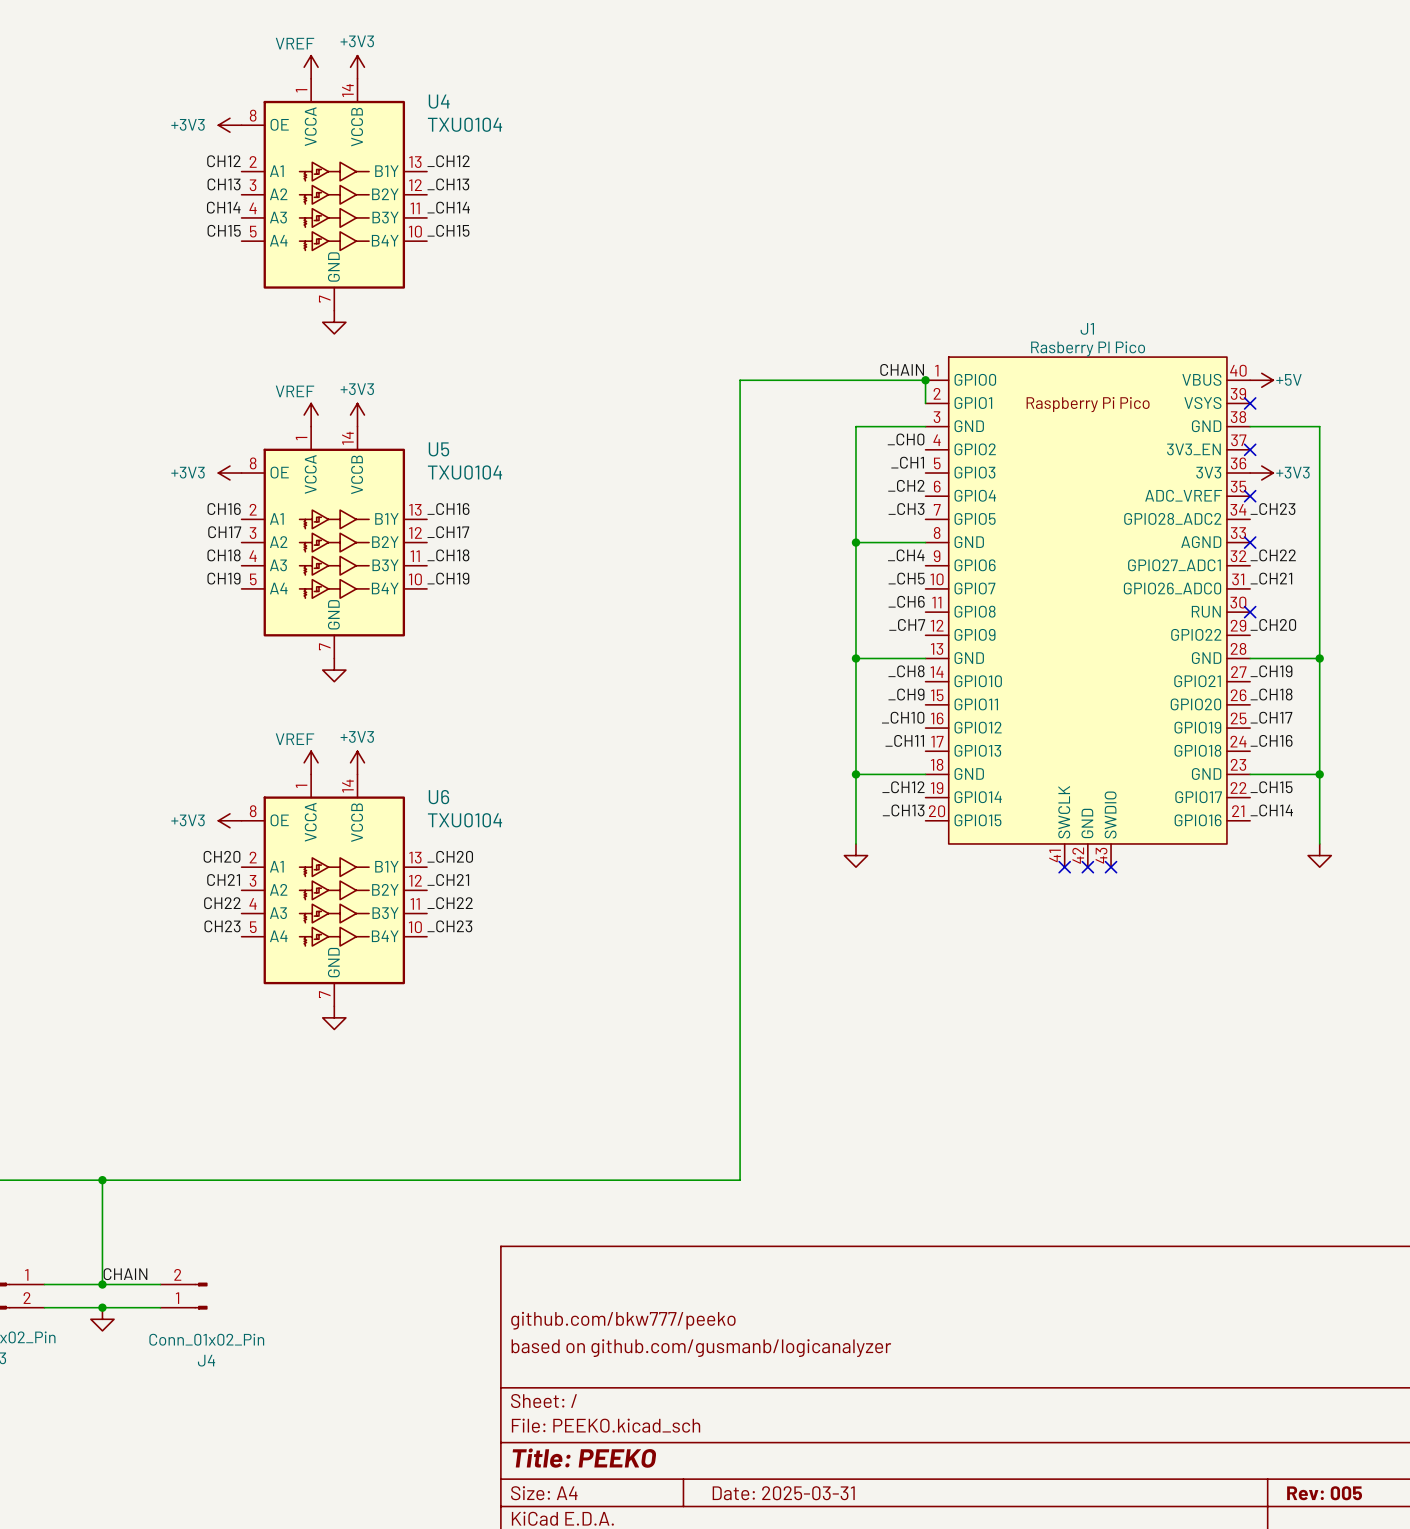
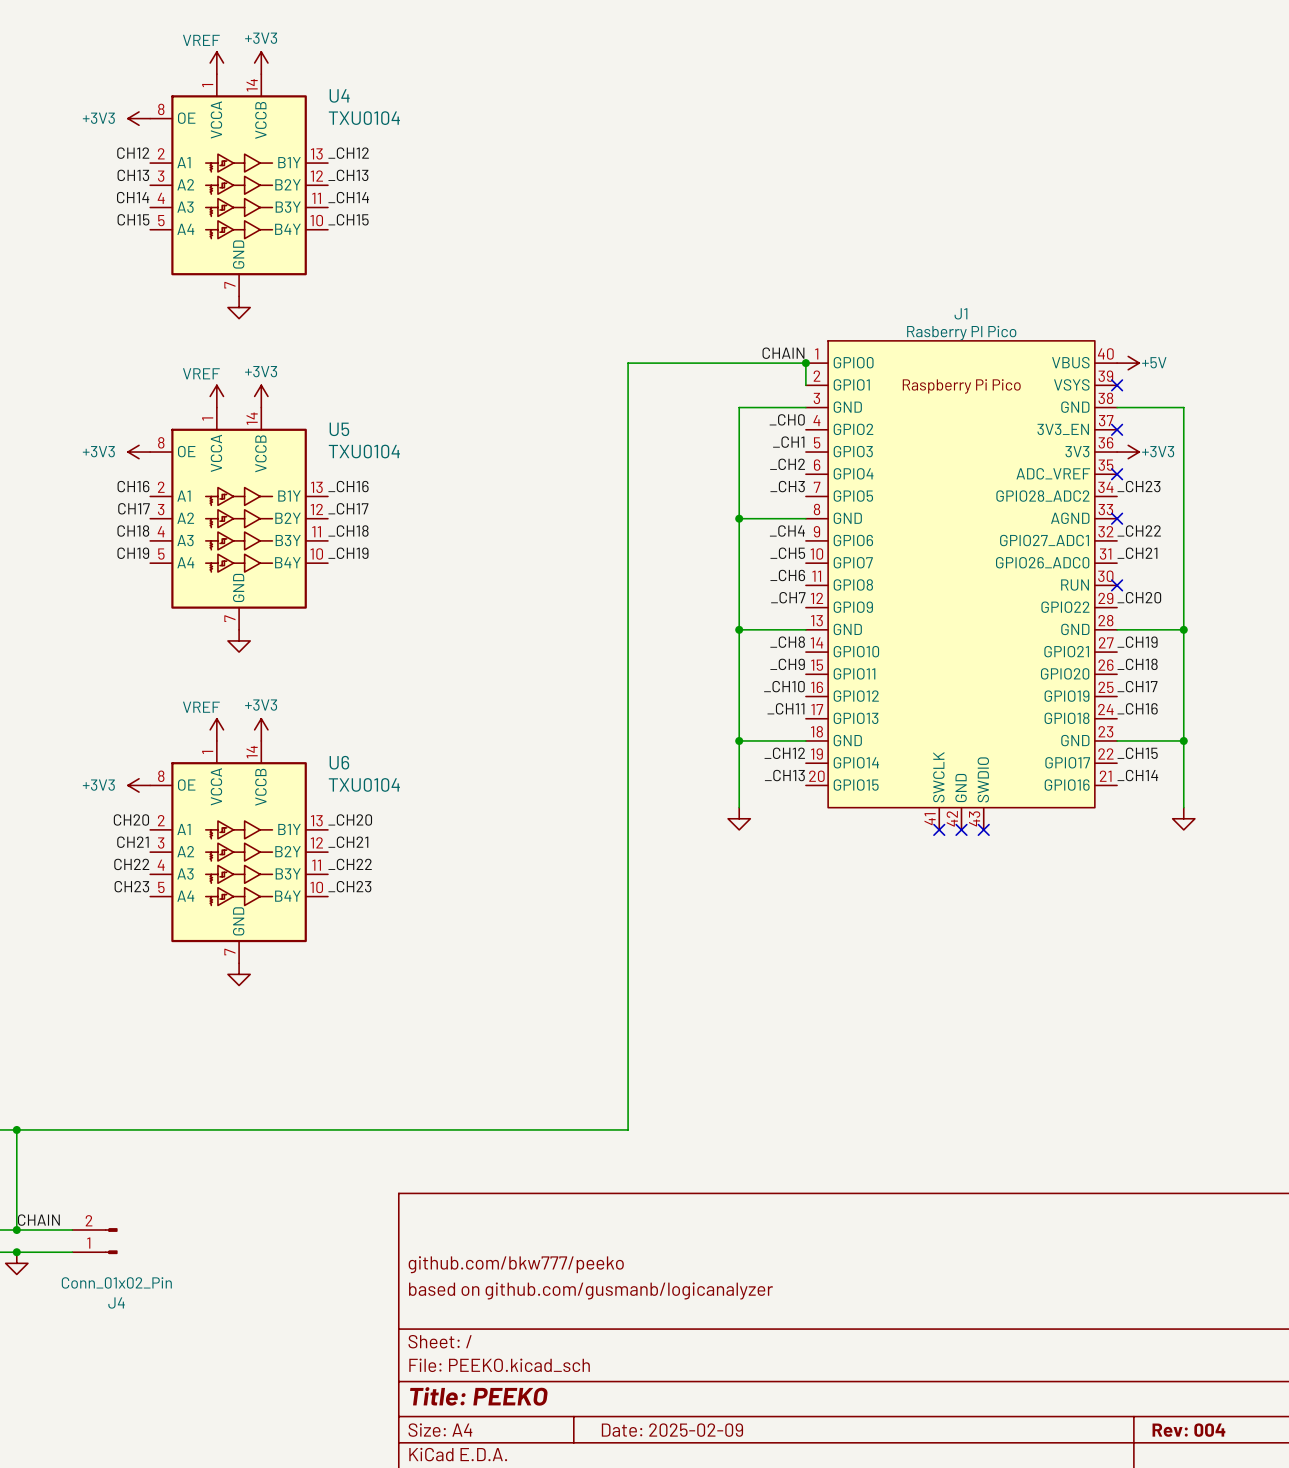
title block: Date: 2025-03-31 (783, 1493) -> Date: 2025-02-09 (672, 1430)
title block: Rev: 005 (1324, 1493) -> Rev: 004 (1188, 1430)

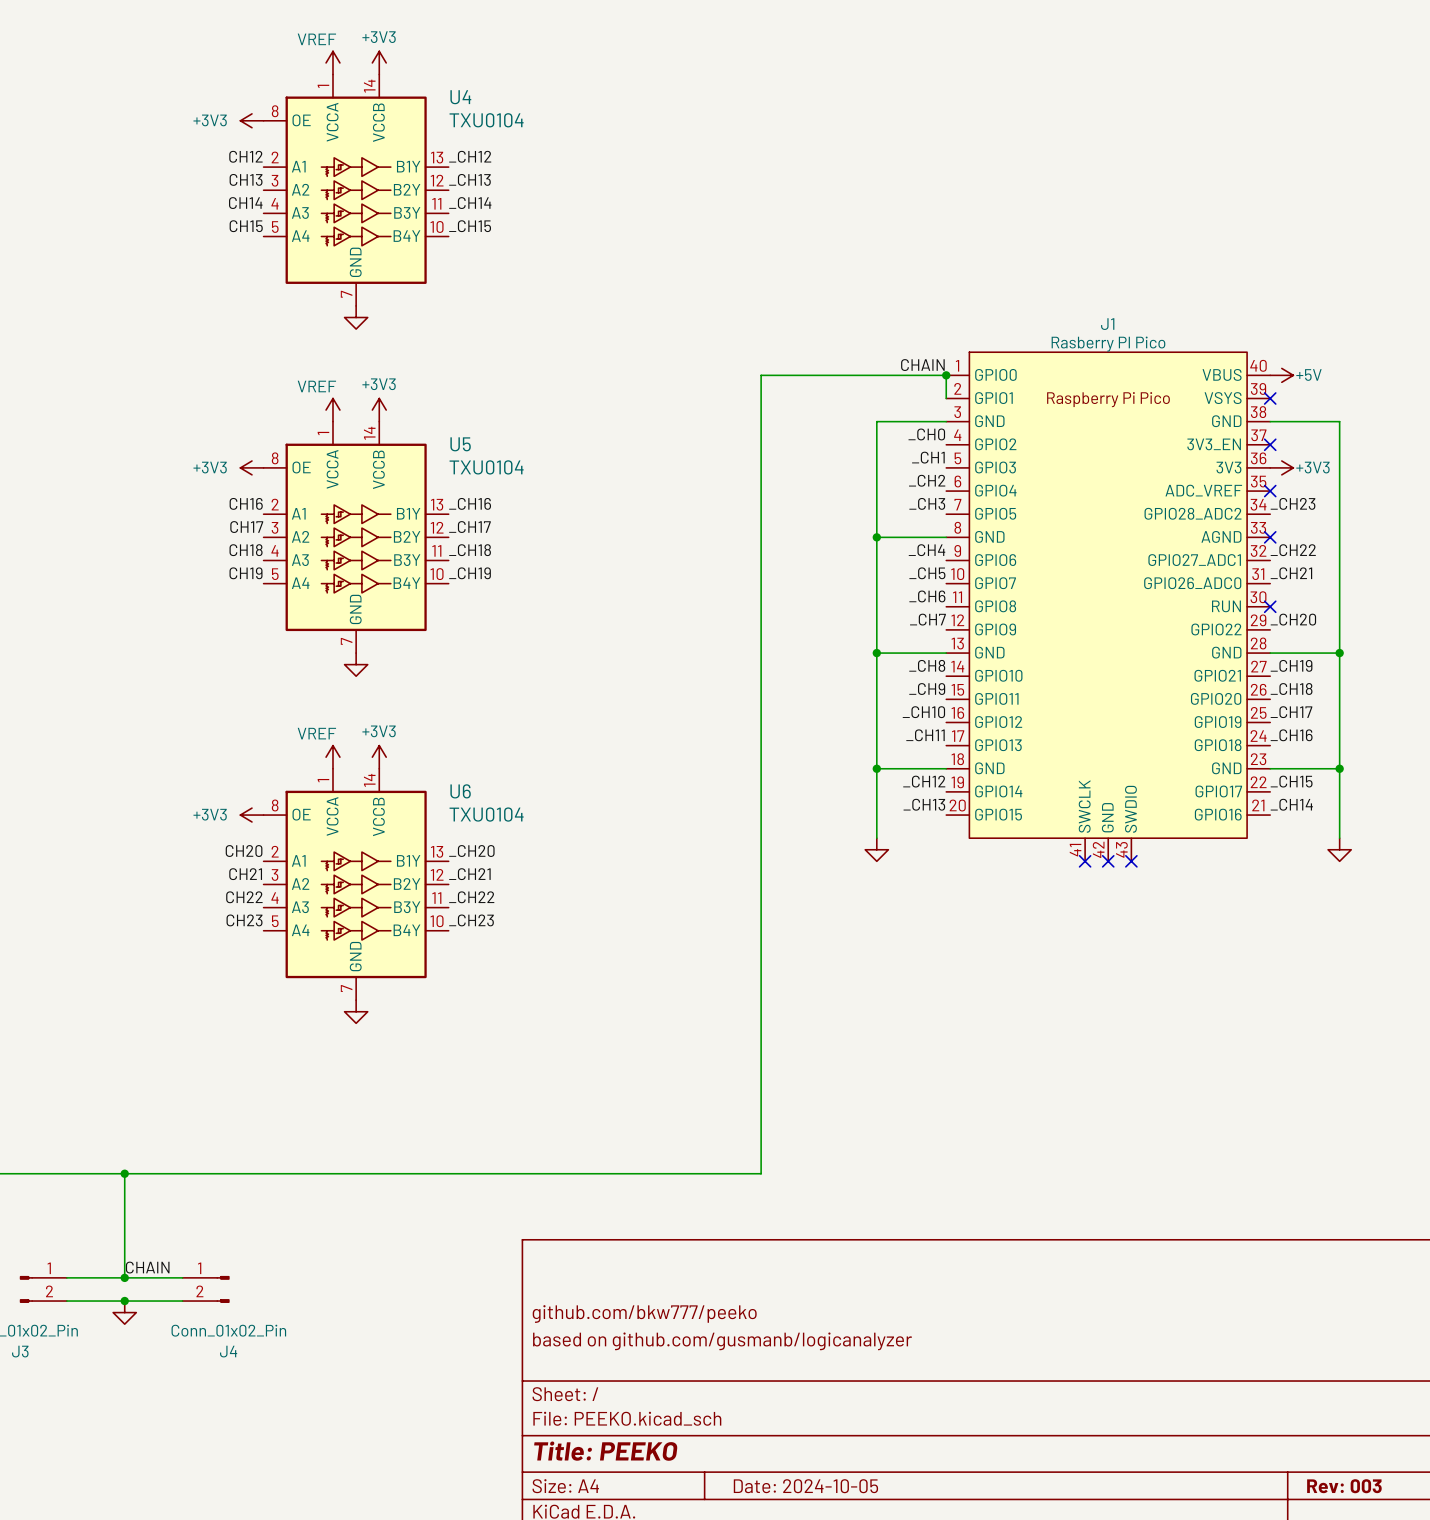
J4 flip: as is (111, 1241) -> up-down (223, 1289)
title block: Date: 2025-02-09 (672, 1430) -> Date: 2024-10-05 (805, 1486)
title block: Rev: 004 (1188, 1430) -> Rev: 003 (1344, 1486)

